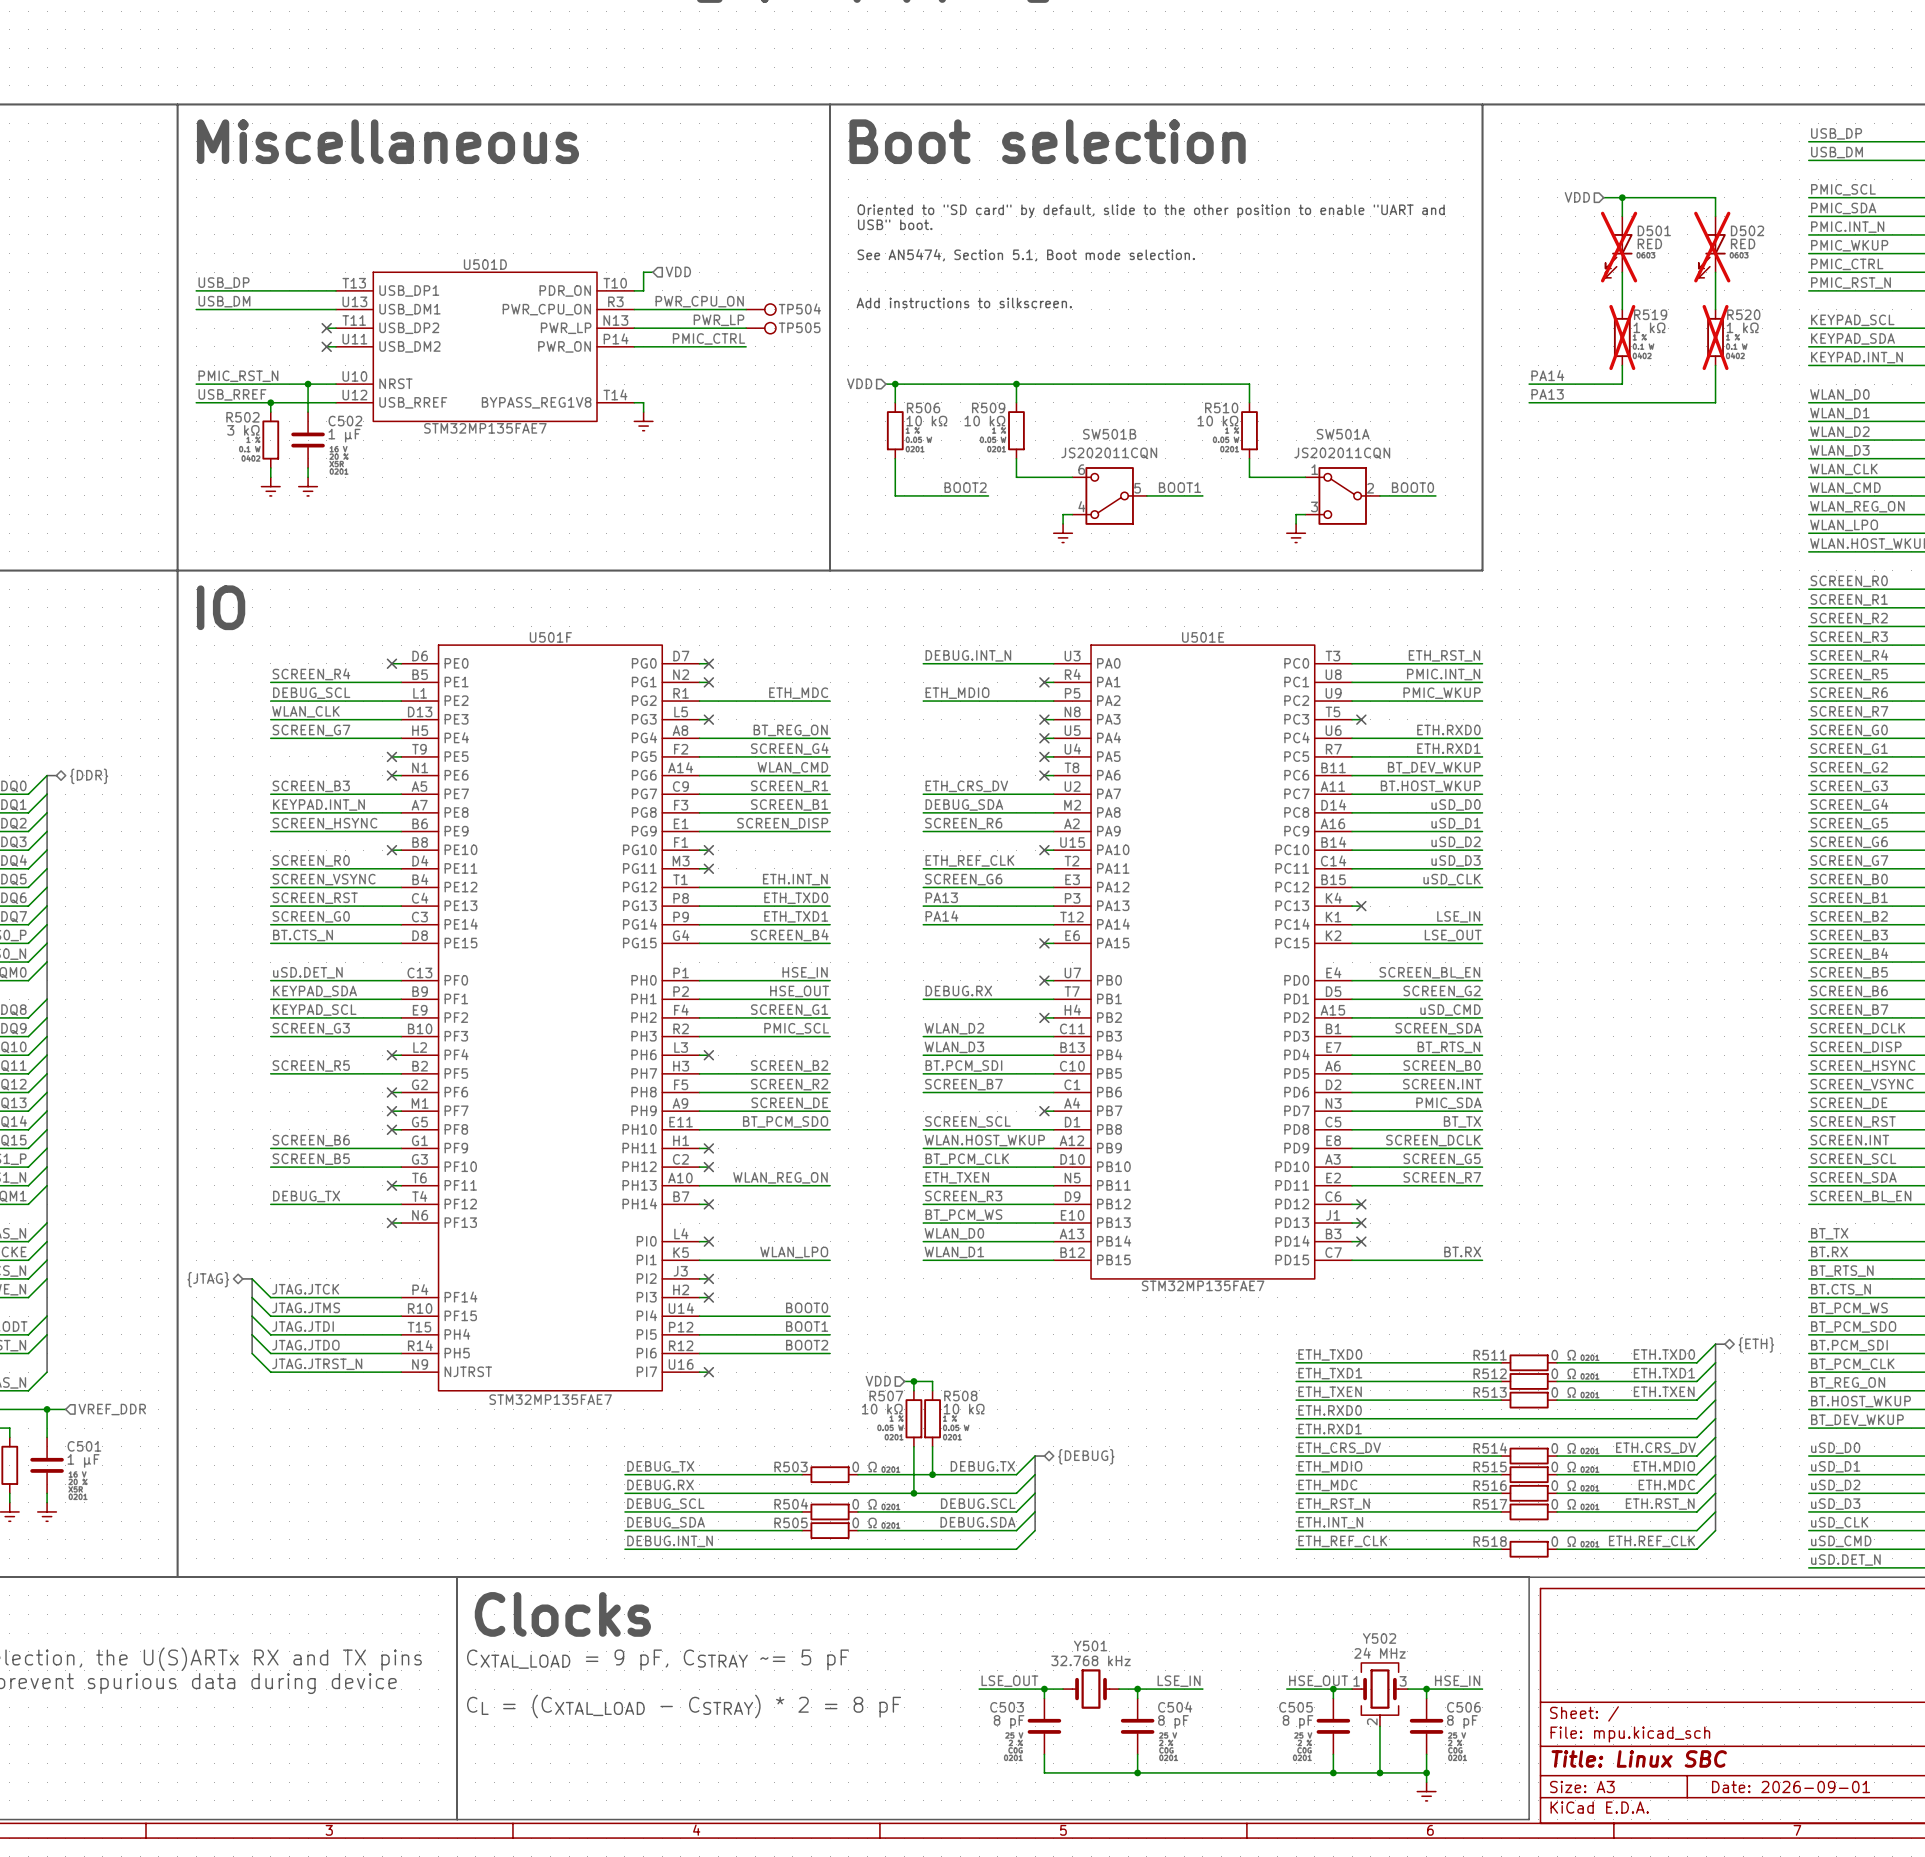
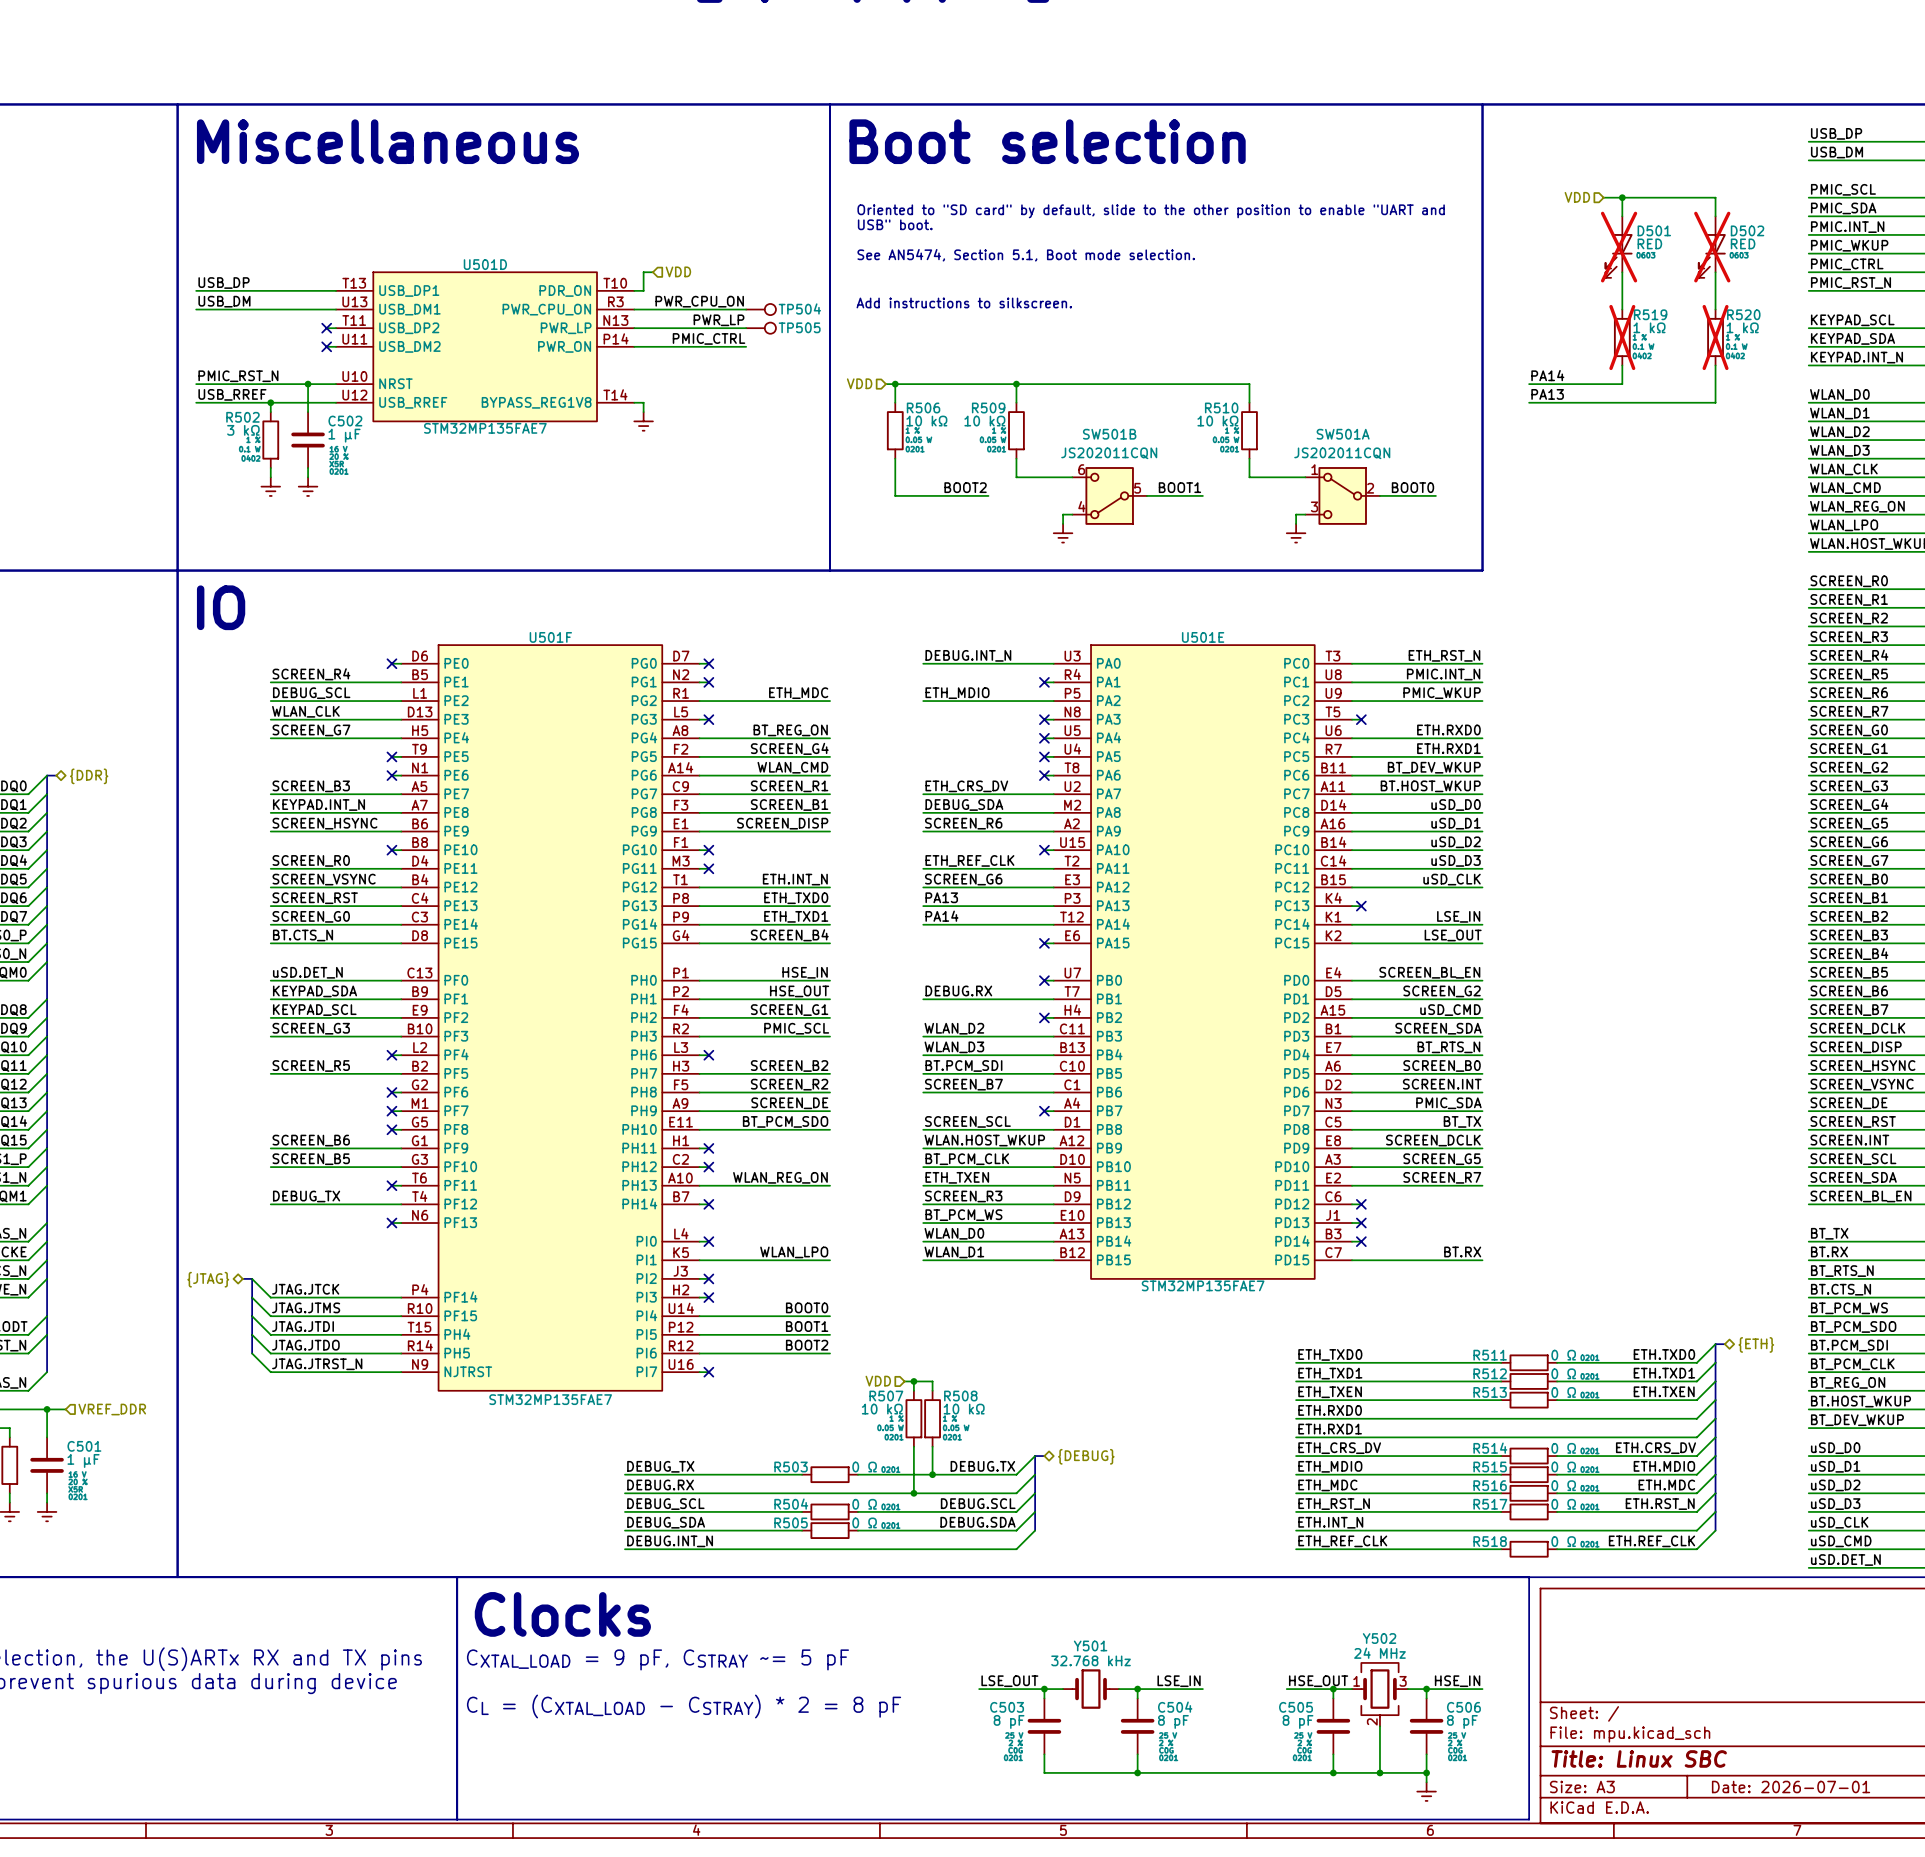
title block: Date: 2026-09-01 (1791, 1787) -> Date: 2026-07-01 (1791, 1787)

